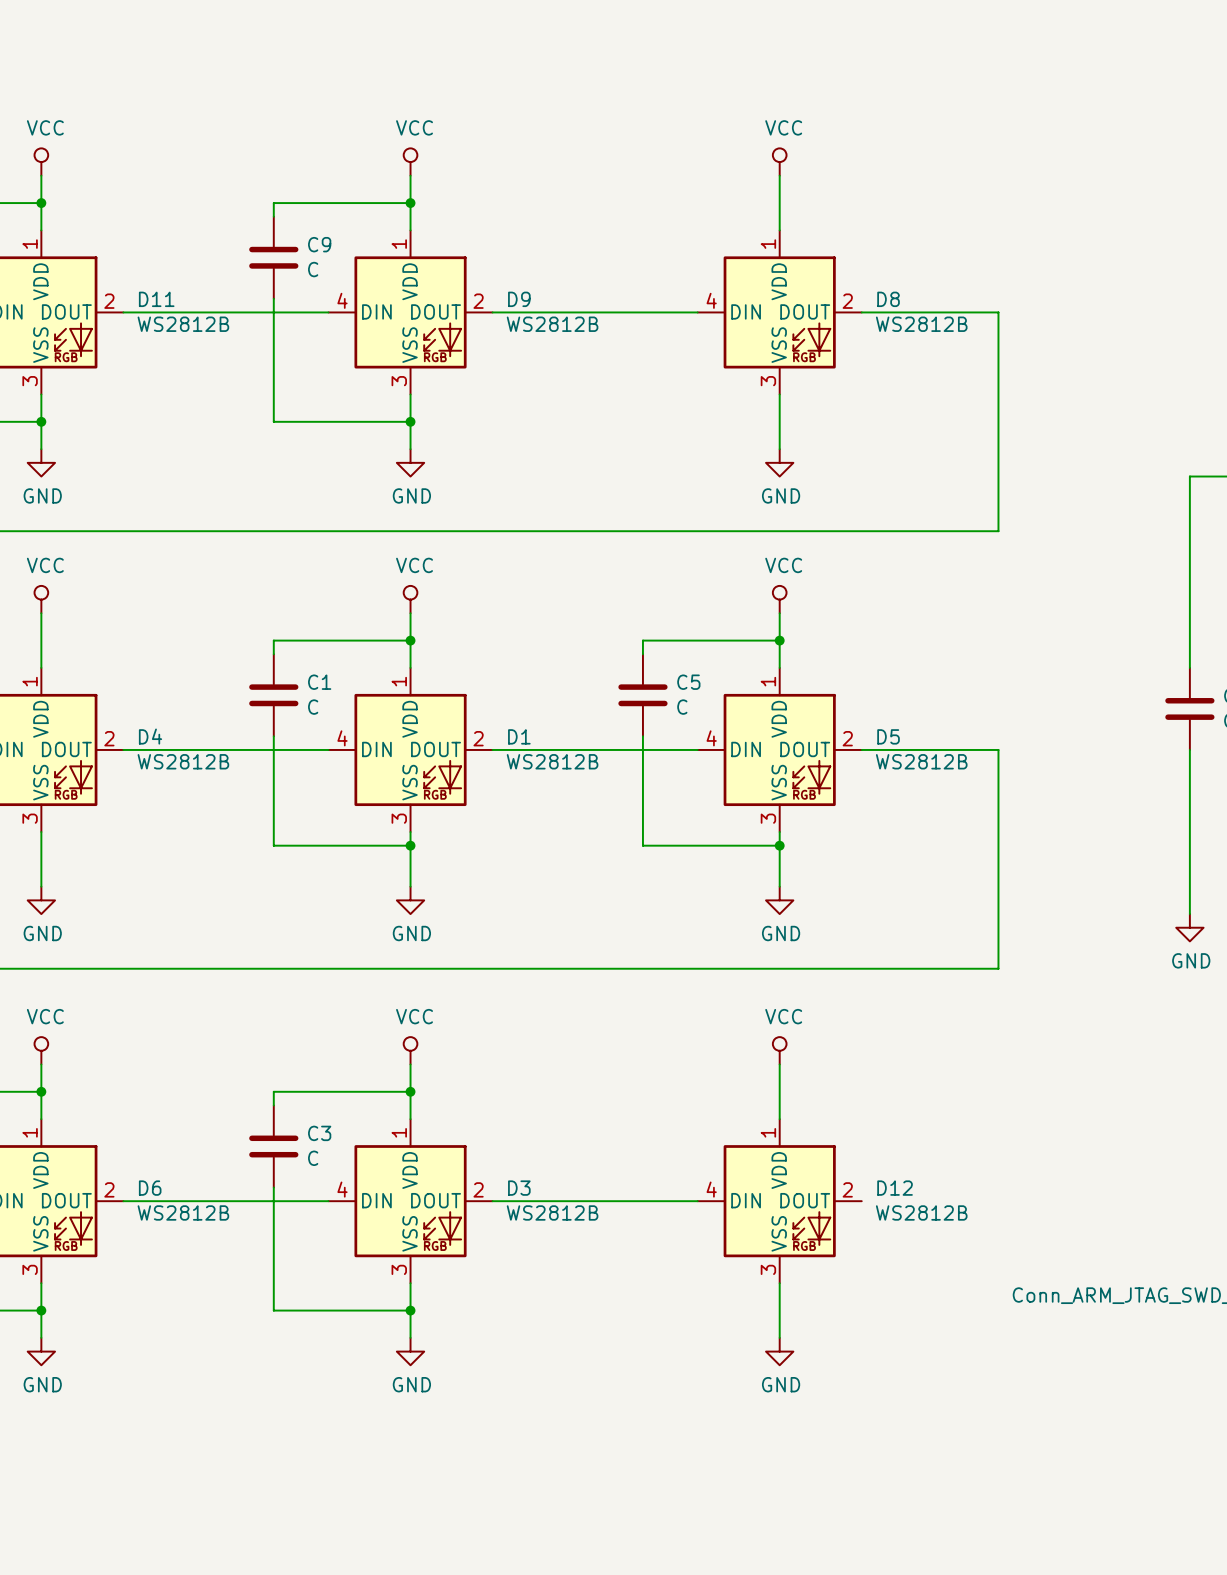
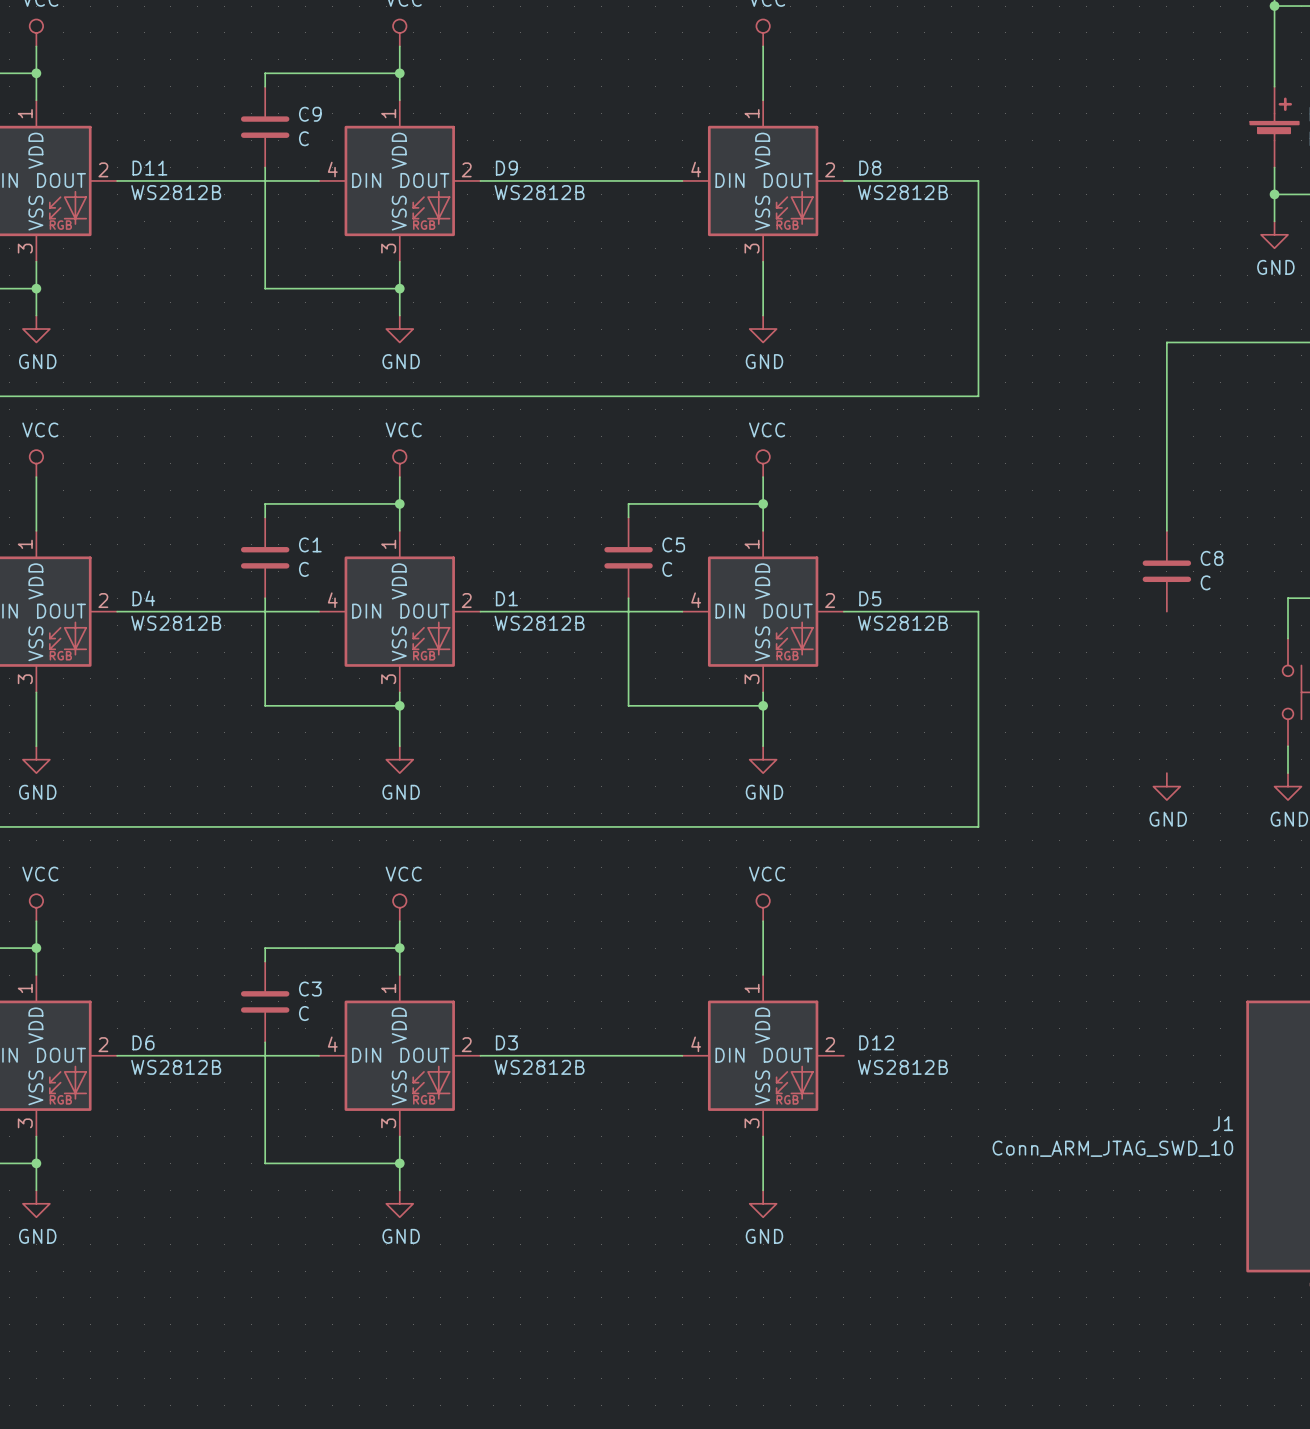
wire: (1189, 749) (1189, 914) -> none

